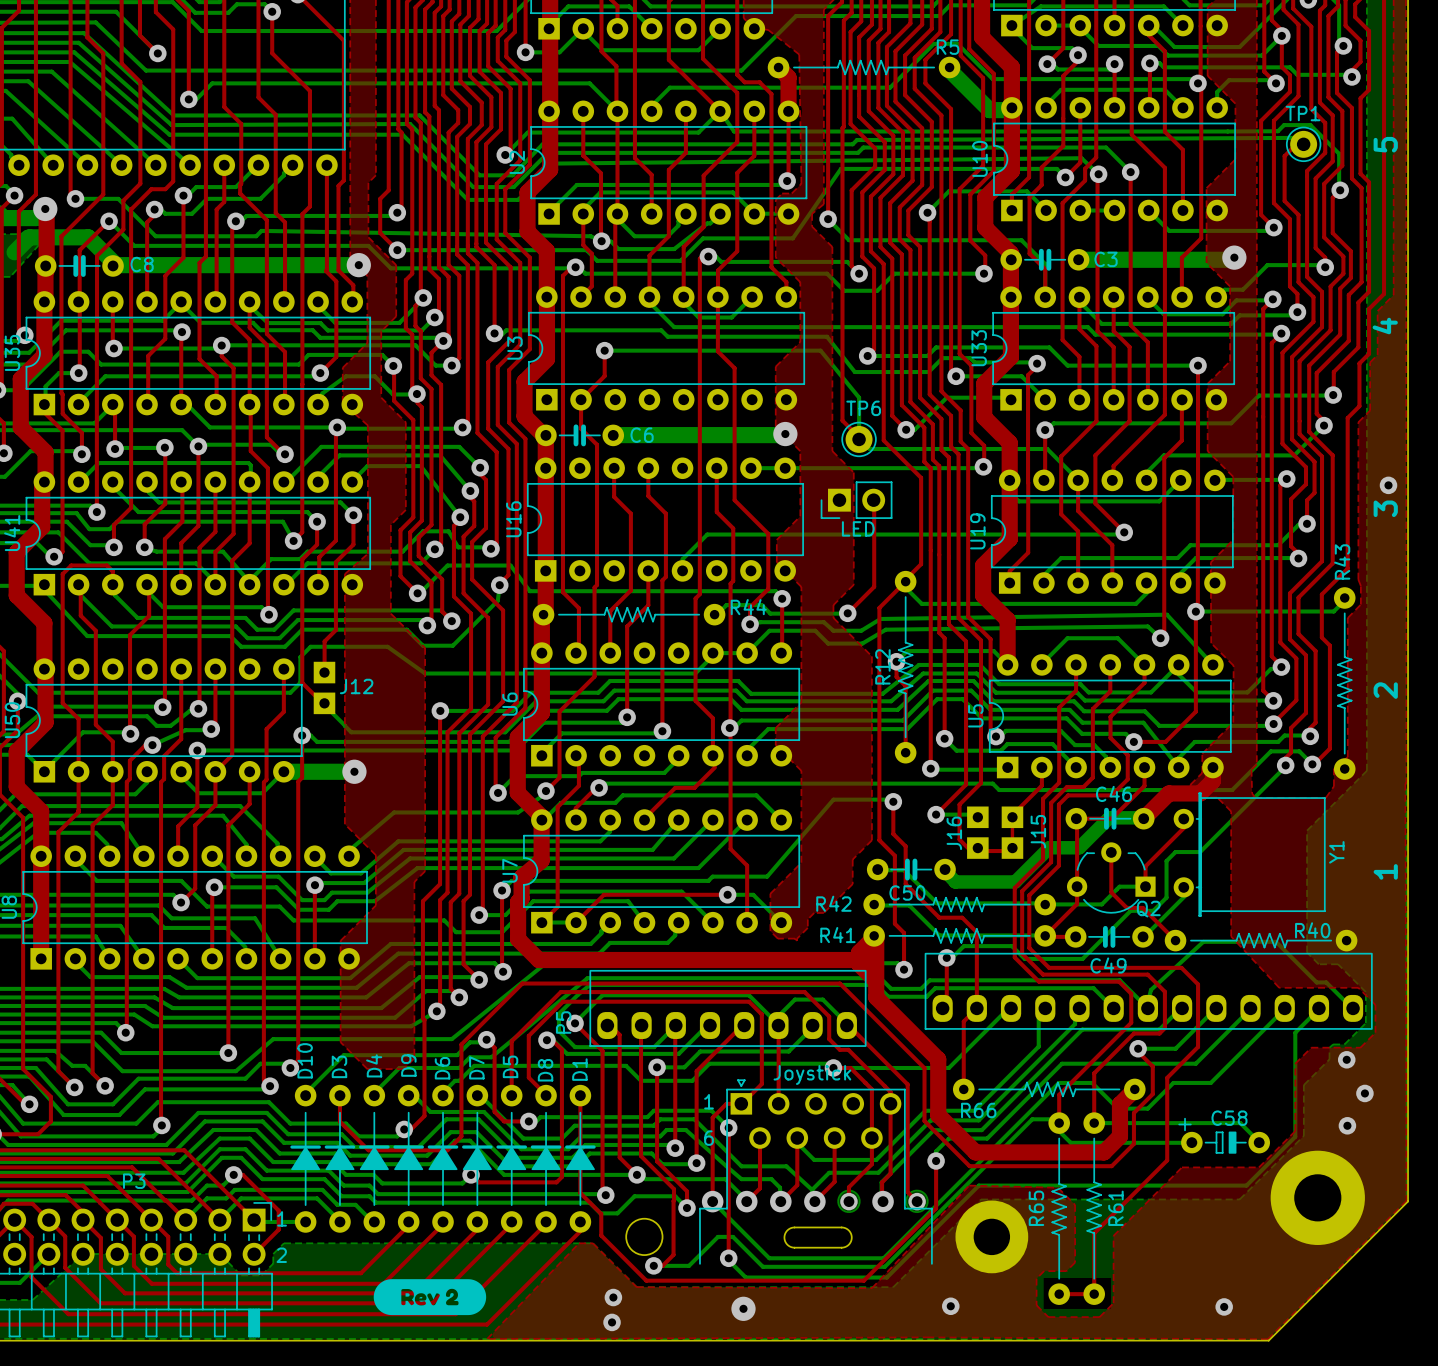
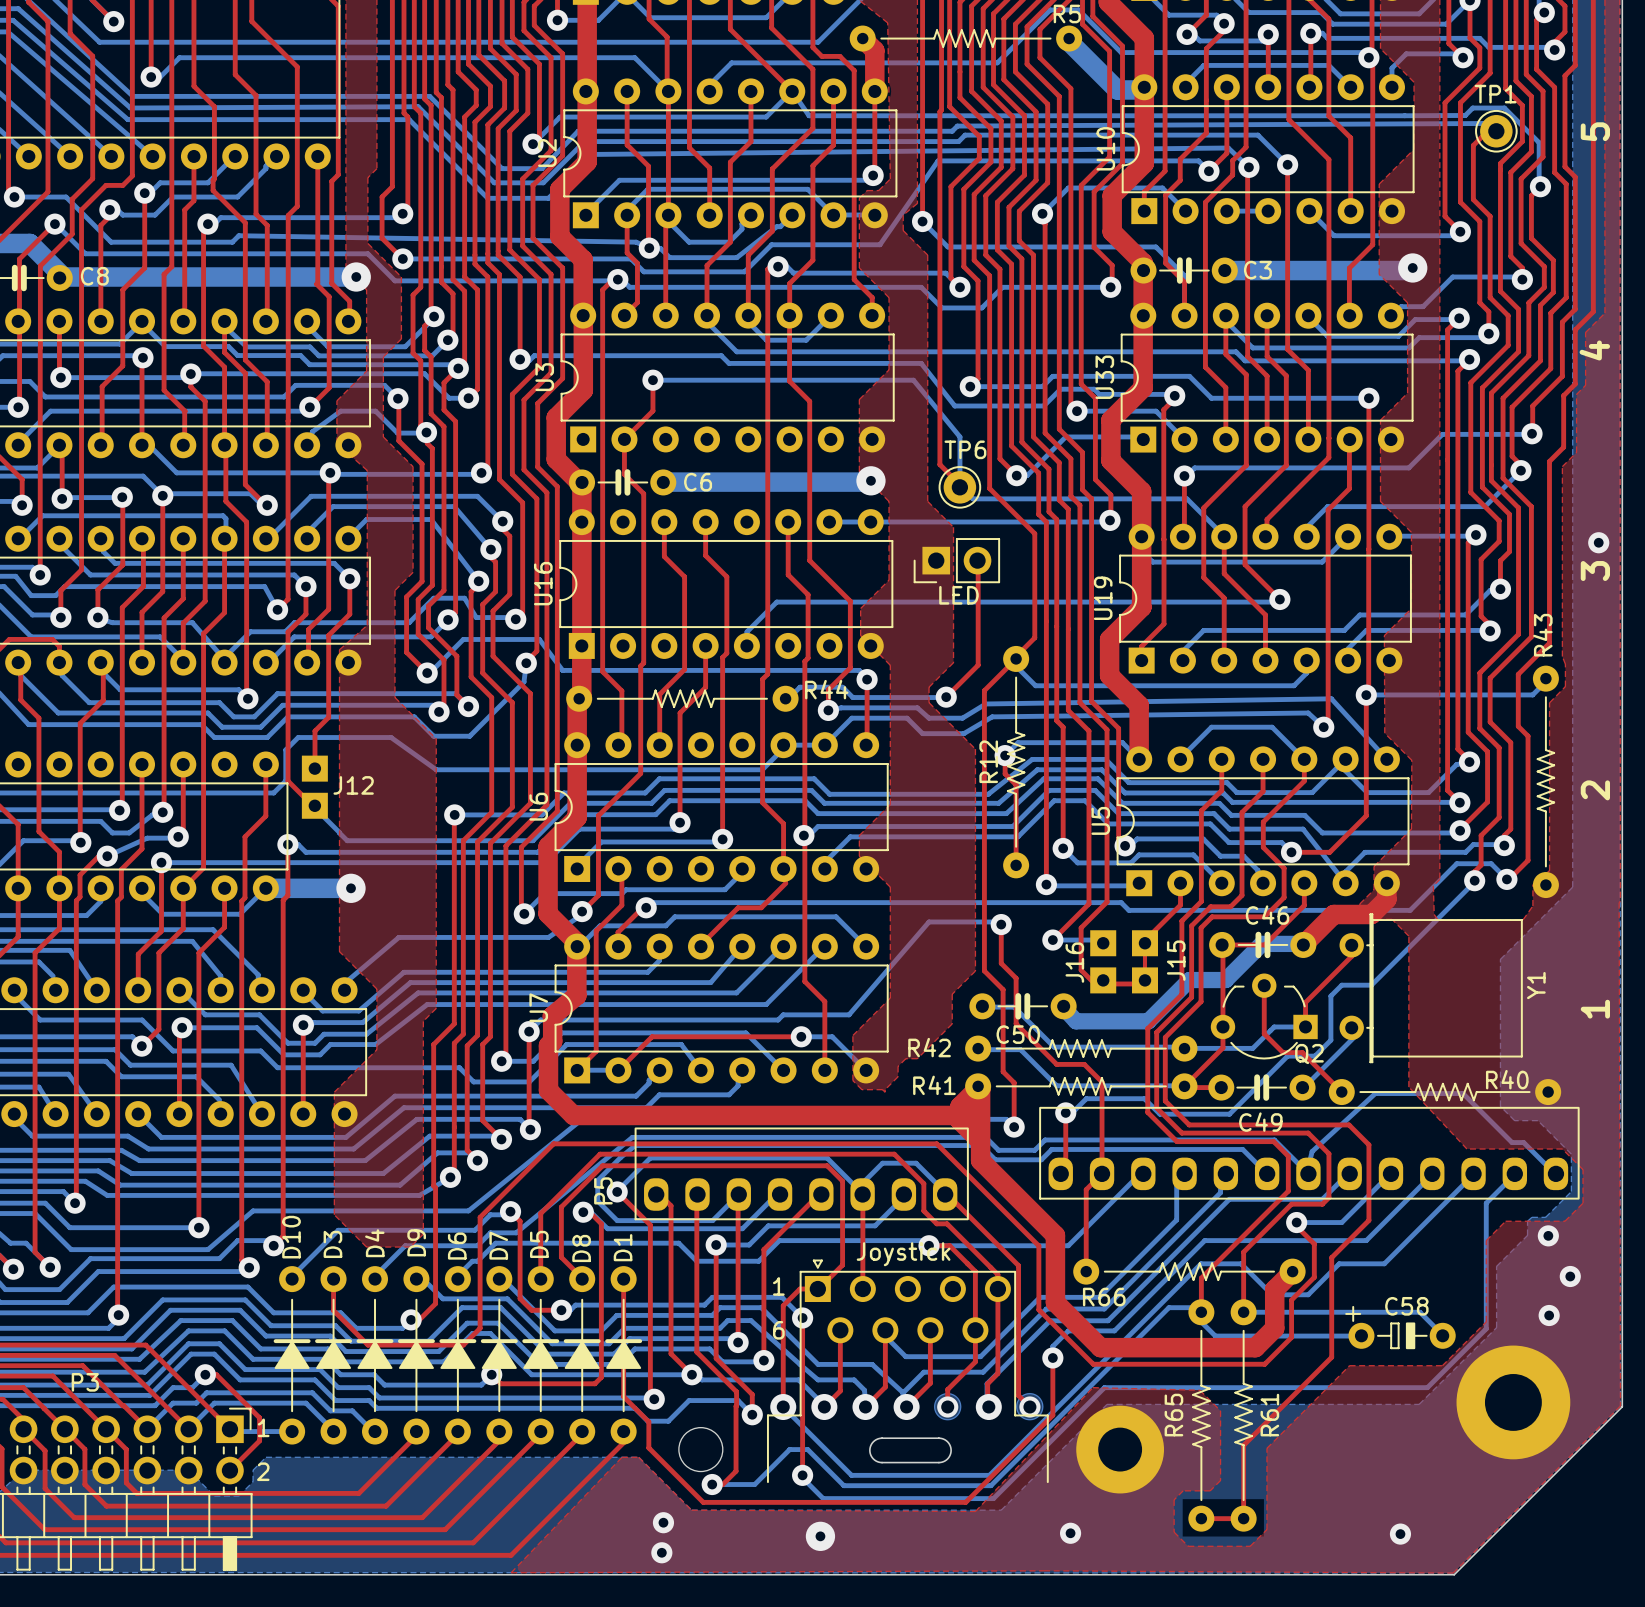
drawing: [373, 1279, 487, 1316] -> none

